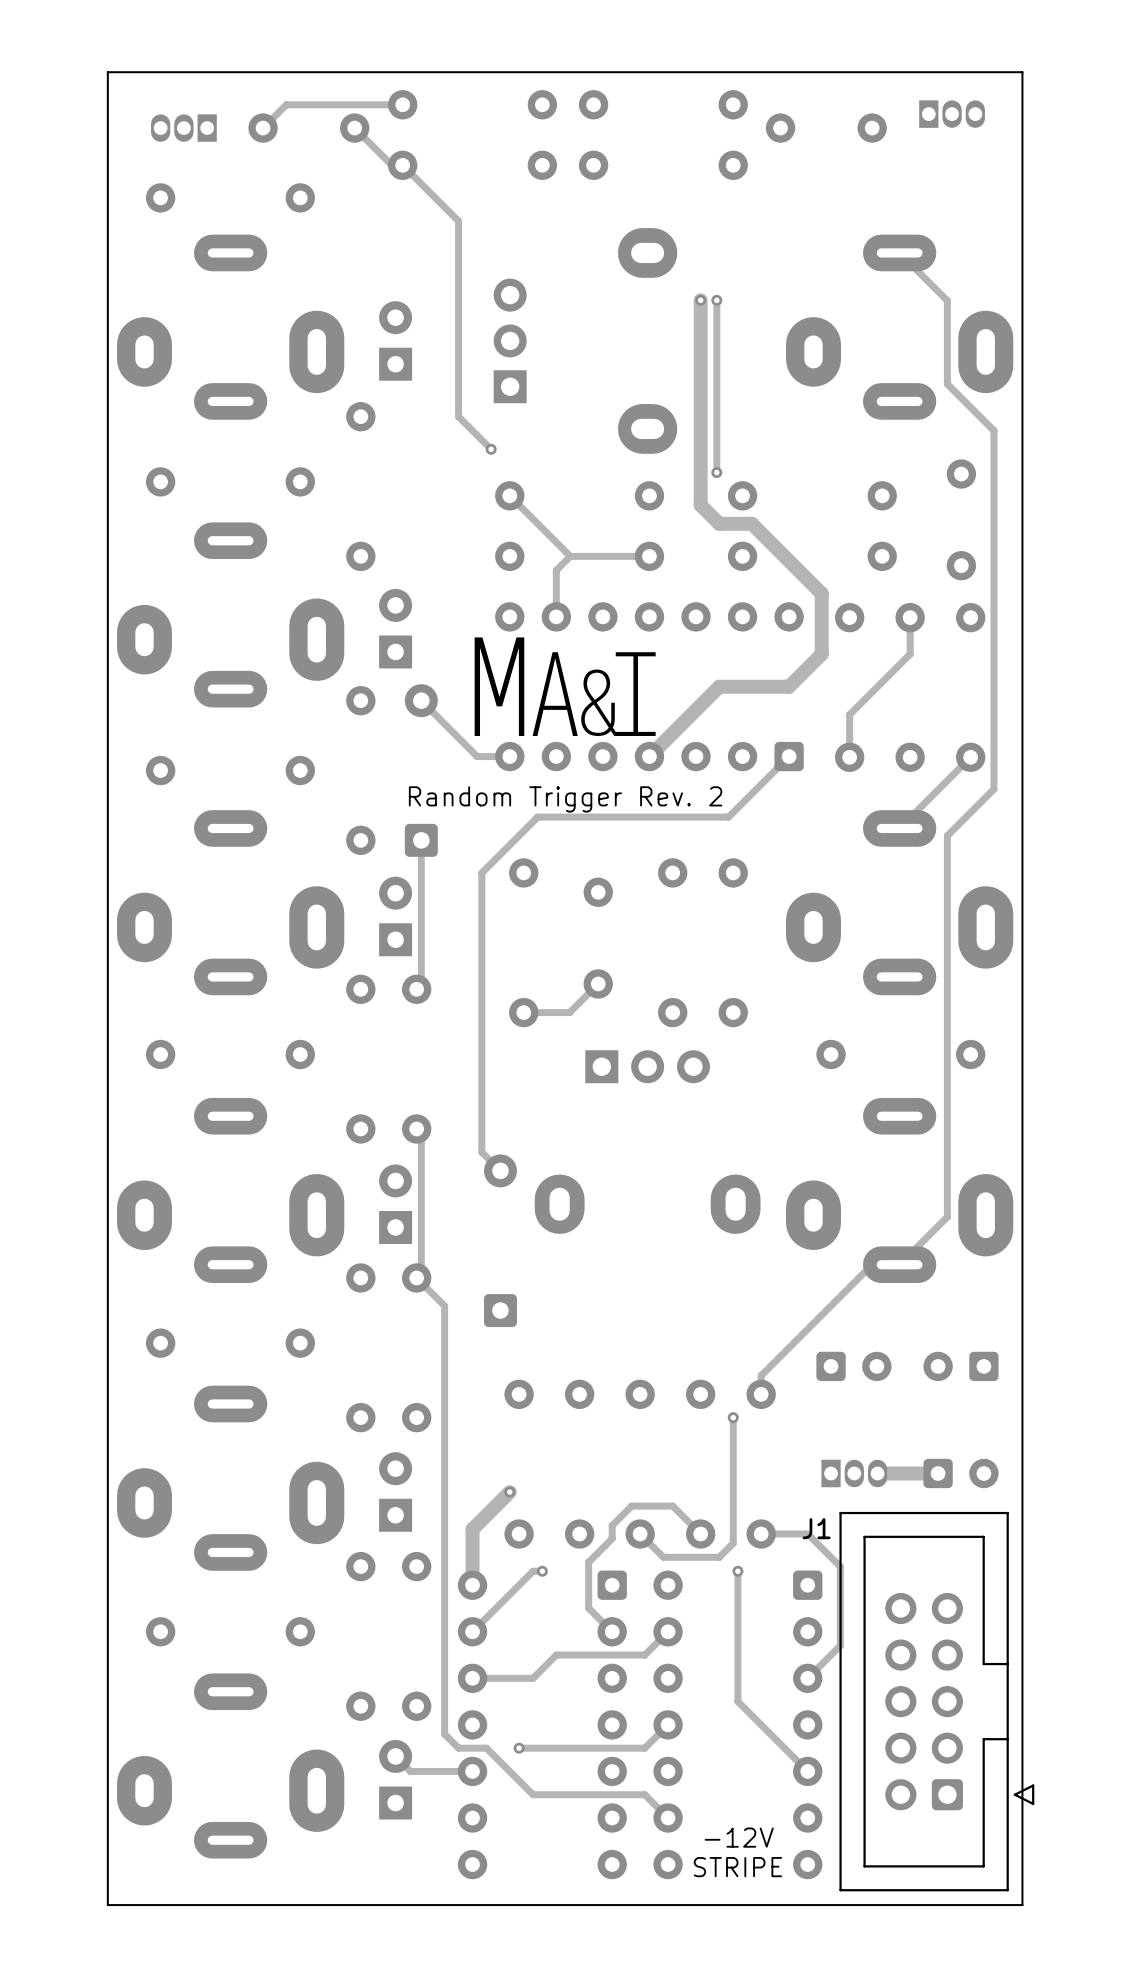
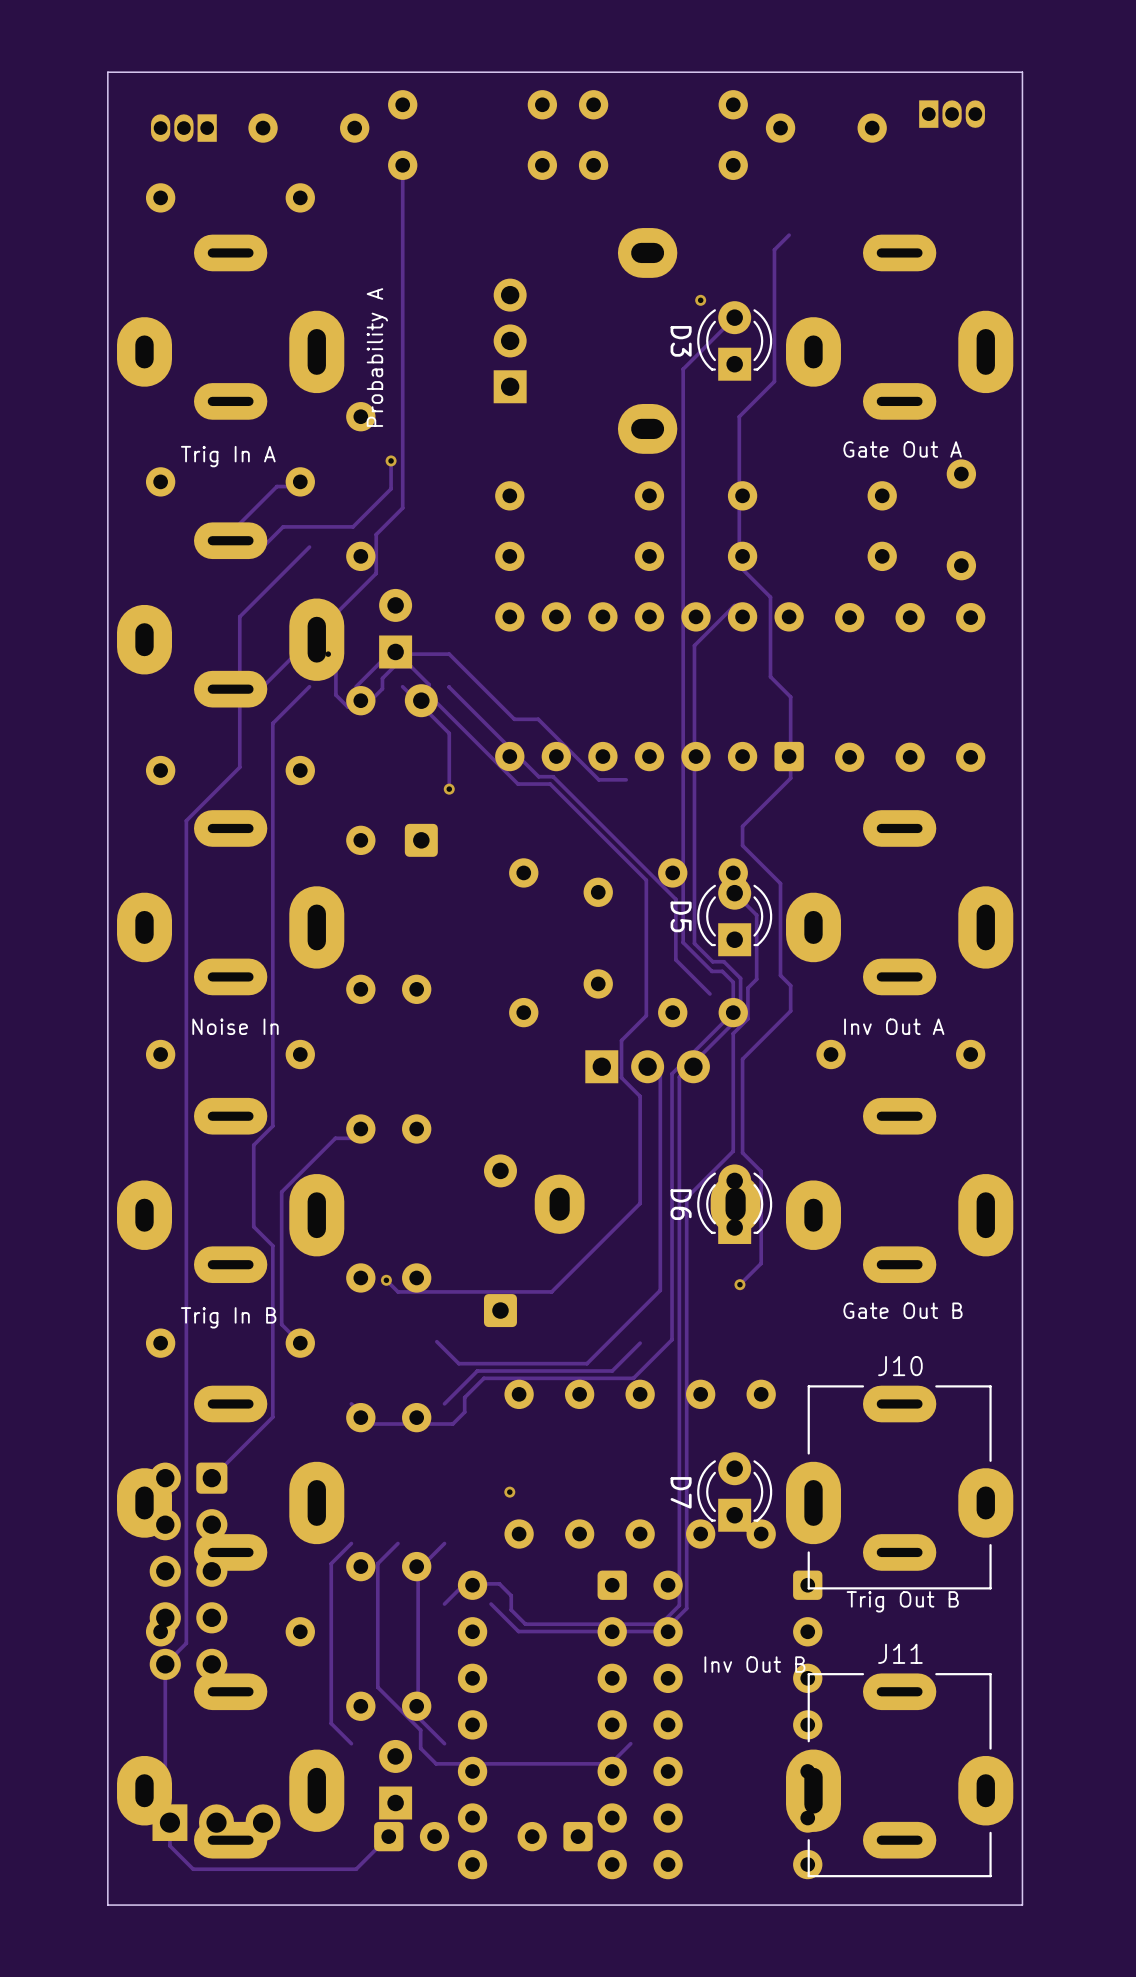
track: (402, 104) (286, 104) (263, 128) -> none
track: (354, 128) (391, 165) (402, 165) (458, 221) (458, 416) (491, 449) -> none
track: none -> (402, 169) (402, 508) (376, 534) (376, 573) (262, 686)
track: none -> (789, 235) (774, 249) (774, 381) (739, 416) (739, 566) (770, 597) (770, 676) (790, 696) (790, 778) (742, 826) (742, 845) (780, 883) (780, 975) (790, 985) (790, 1011) (742, 1059) (742, 1152) (761, 1171) (761, 1263) (739, 1284)
track: (899, 252) (947, 300) (947, 384) (993, 430) (993, 789) (947, 835) (947, 1216) (899, 1264) (872, 1264) (761, 1375) (761, 1394) -> none
track: (700, 300) (700, 505) (719, 523) (751, 523) (821, 593) (821, 654) (789, 686) (719, 686) (649, 756) -> none
track: (716, 300) (716, 472) -> none
via: (716, 300) -> none
track: none -> (734, 317) (683, 369) (683, 942) (711, 971) (722, 971) (733, 982) (733, 1012) (672, 1073) (672, 1339) (633, 1378) (483, 1378) (464, 1397) (464, 1412) (452, 1424) (371, 1424) (351, 1403)
D3 side: top (395, 340) -> bottom (734, 340)
text: none -> Probability A (377, 357)
via position: (491, 449) -> (391, 460)
text: none -> Gate Out A (902, 449)
text: none -> Trig In A (228, 456)
track: none -> (391, 460) (391, 488) (353, 526) (283, 526) (262, 547)
via: (716, 472) -> none
track: none -> (290, 486) (276, 486) (216, 547)
track: (509, 495) (570, 556) -> none
track: none -> (309, 547) (239, 616) (239, 767) (186, 820) (186, 1643) (165, 1664) (165, 1818) (169, 1822) (169, 1845) (193, 1869) (356, 1869) (388, 1836)
track: (570, 556) (556, 570) (556, 616) -> none
track: (649, 556) (570, 556) -> none
track: none -> (734, 605) (694, 645) (694, 943) (712, 961) (723, 961) (740, 978) (740, 1015) (679, 1077) (679, 1605) (660, 1624) (525, 1624) (511, 1609) (511, 1595) (499, 1583) (464, 1583) (444, 1604)
track: (910, 617) (910, 654) (849, 714) (849, 757) -> none
drawing: [474, 637, 656, 737] -> none
track: none -> (328, 654) (335, 661) (335, 695) (347, 706) (364, 706) (382, 688) (382, 678) (394, 666) (410, 666) (429, 684) (429, 695) (517, 784) (550, 784) (646, 880) (646, 1015) (621, 1040) (621, 1077) (640, 1096) (640, 1203) (551, 1291) (398, 1291) (386, 1280)
via: none -> (328, 654)
track: none -> (309, 686) (272, 723) (272, 1126) (253, 1145) (253, 1226) (272, 1245) (272, 1417) (211, 1478)
track: none -> (356, 686) (388, 654) (449, 654) (514, 719) (538, 719) (598, 779) (626, 779)
track: none -> (402, 686) (449, 733) (449, 789)
track: none -> (449, 686) (538, 776) (553, 776) (675, 899) (675, 959) (709, 993)
track: (421, 700) (477, 756) (509, 756) -> none
track: (789, 756) (728, 817) (537, 817) (481, 872) (481, 1152) (500, 1170) -> none
track: (970, 757) (899, 828) -> none
via: none -> (449, 789)
text: Random Trigger Rev. 2 (565, 799) -> none
track: (421, 840) (421, 984) (416, 989) -> none
track: none -> (734, 893) (756, 915) (756, 979) (747, 988) (747, 1018) (733, 1033) (733, 1151) (686, 1197) (686, 1608) (663, 1631) (518, 1631) (491, 1604)
D5 side: top (395, 916) -> bottom (734, 916)
track: (598, 983) (569, 1012) (523, 1012) -> none
text: none -> Noise In (235, 1026)
text: none -> Inv Out A (894, 1026)
track: none -> (643, 1059) (660, 1075) (660, 1290) (587, 1363) (458, 1363) (436, 1341)
track: (416, 1128) (421, 1133) (421, 1273) (416, 1277) (444, 1305) (444, 1734) (458, 1748) (486, 1748) (533, 1794) (644, 1794) (668, 1818) -> none
track: none -> (356, 1138) (335, 1138) (281, 1192) (281, 1324) (300, 1343)
D6 side: top (395, 1204) -> bottom (734, 1204)
via: none -> (386, 1280)
via: none -> (739, 1284)
text: none -> Gate Out B (902, 1310)
text: none -> Trig In B (228, 1317)
track: none -> (640, 1343) (612, 1371) (477, 1371) (444, 1403)
part: (853, 1366) -> none
part: (961, 1366) -> none
track: (733, 1417) (733, 1543) (719, 1557) (663, 1557) (640, 1534) -> none
via: (733, 1417) -> none
part: (854, 1473) -> none
track: (938, 1473) (877, 1473) -> none
part: (961, 1473) -> none
J10: none -> (899, 1487)
D7 side: top (395, 1491) -> bottom (734, 1491)
track: (509, 1492) (472, 1529) (472, 1585) -> none
track: (700, 1534) (672, 1506) (631, 1506) (612, 1525) (612, 1538) (588, 1562) (588, 1608) (612, 1631) -> none
track: (761, 1534) (807, 1534) (840, 1566) (840, 1645) (807, 1678) -> none
track: none -> (351, 1543) (331, 1563) (331, 1723) (351, 1743)
track: none -> (397, 1543) (377, 1563) (377, 1687) (420, 1730) (420, 1748) (436, 1763) (610, 1763) (630, 1743)
track: none -> (444, 1543) (418, 1569) (418, 1717) (444, 1743)
part: none -> (188, 1571)
track: (542, 1571) (533, 1571) (472, 1631) -> none
via: (542, 1571) -> none
track: (737, 1571) (737, 1701) (807, 1771) -> none
via: (737, 1571) -> none
text: none -> Trig Out B (902, 1601)
track: (668, 1631) (644, 1655) (556, 1655) (533, 1678) (472, 1678) -> none
text: none -> Inv Out B (754, 1664)
J1: (936, 1701) -> none
track: (668, 1724) (644, 1748) (519, 1748) -> none
via: (519, 1748) -> none
track: (395, 1756) (410, 1771) (472, 1771) -> none
J11: none -> (899, 1775)
part: none -> (216, 1822)
part: none -> (411, 1836)
part: none -> (555, 1836)
text: -12V (739, 1837) -> none
text: STRIPE (737, 1867) -> none

